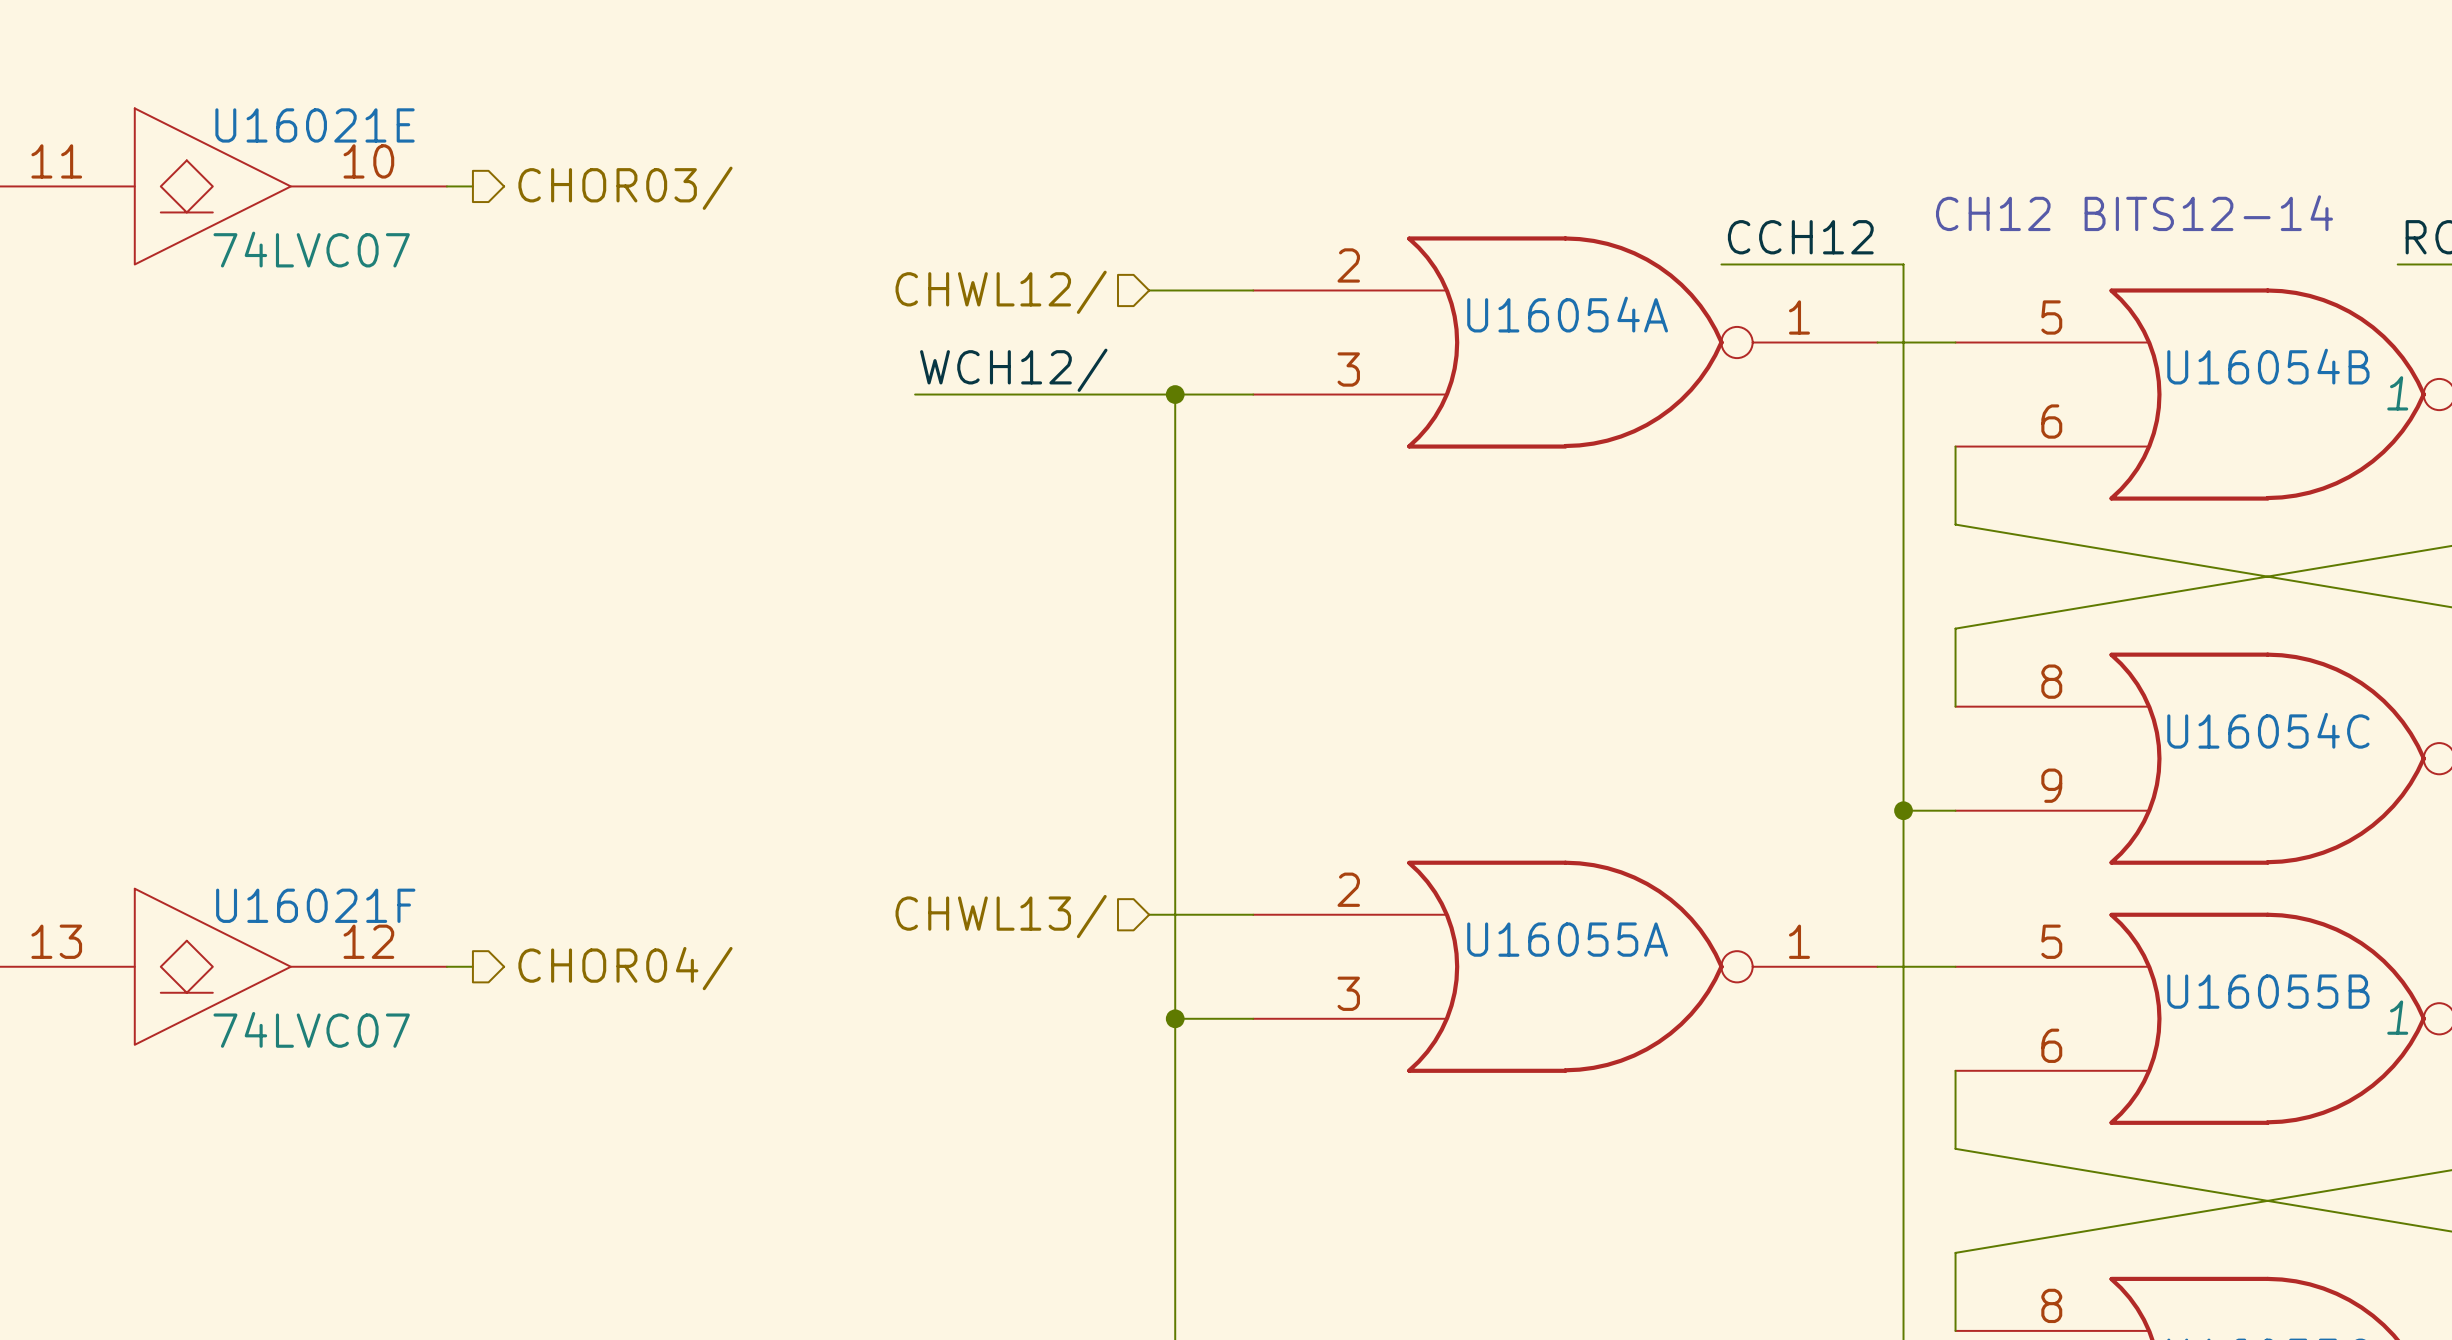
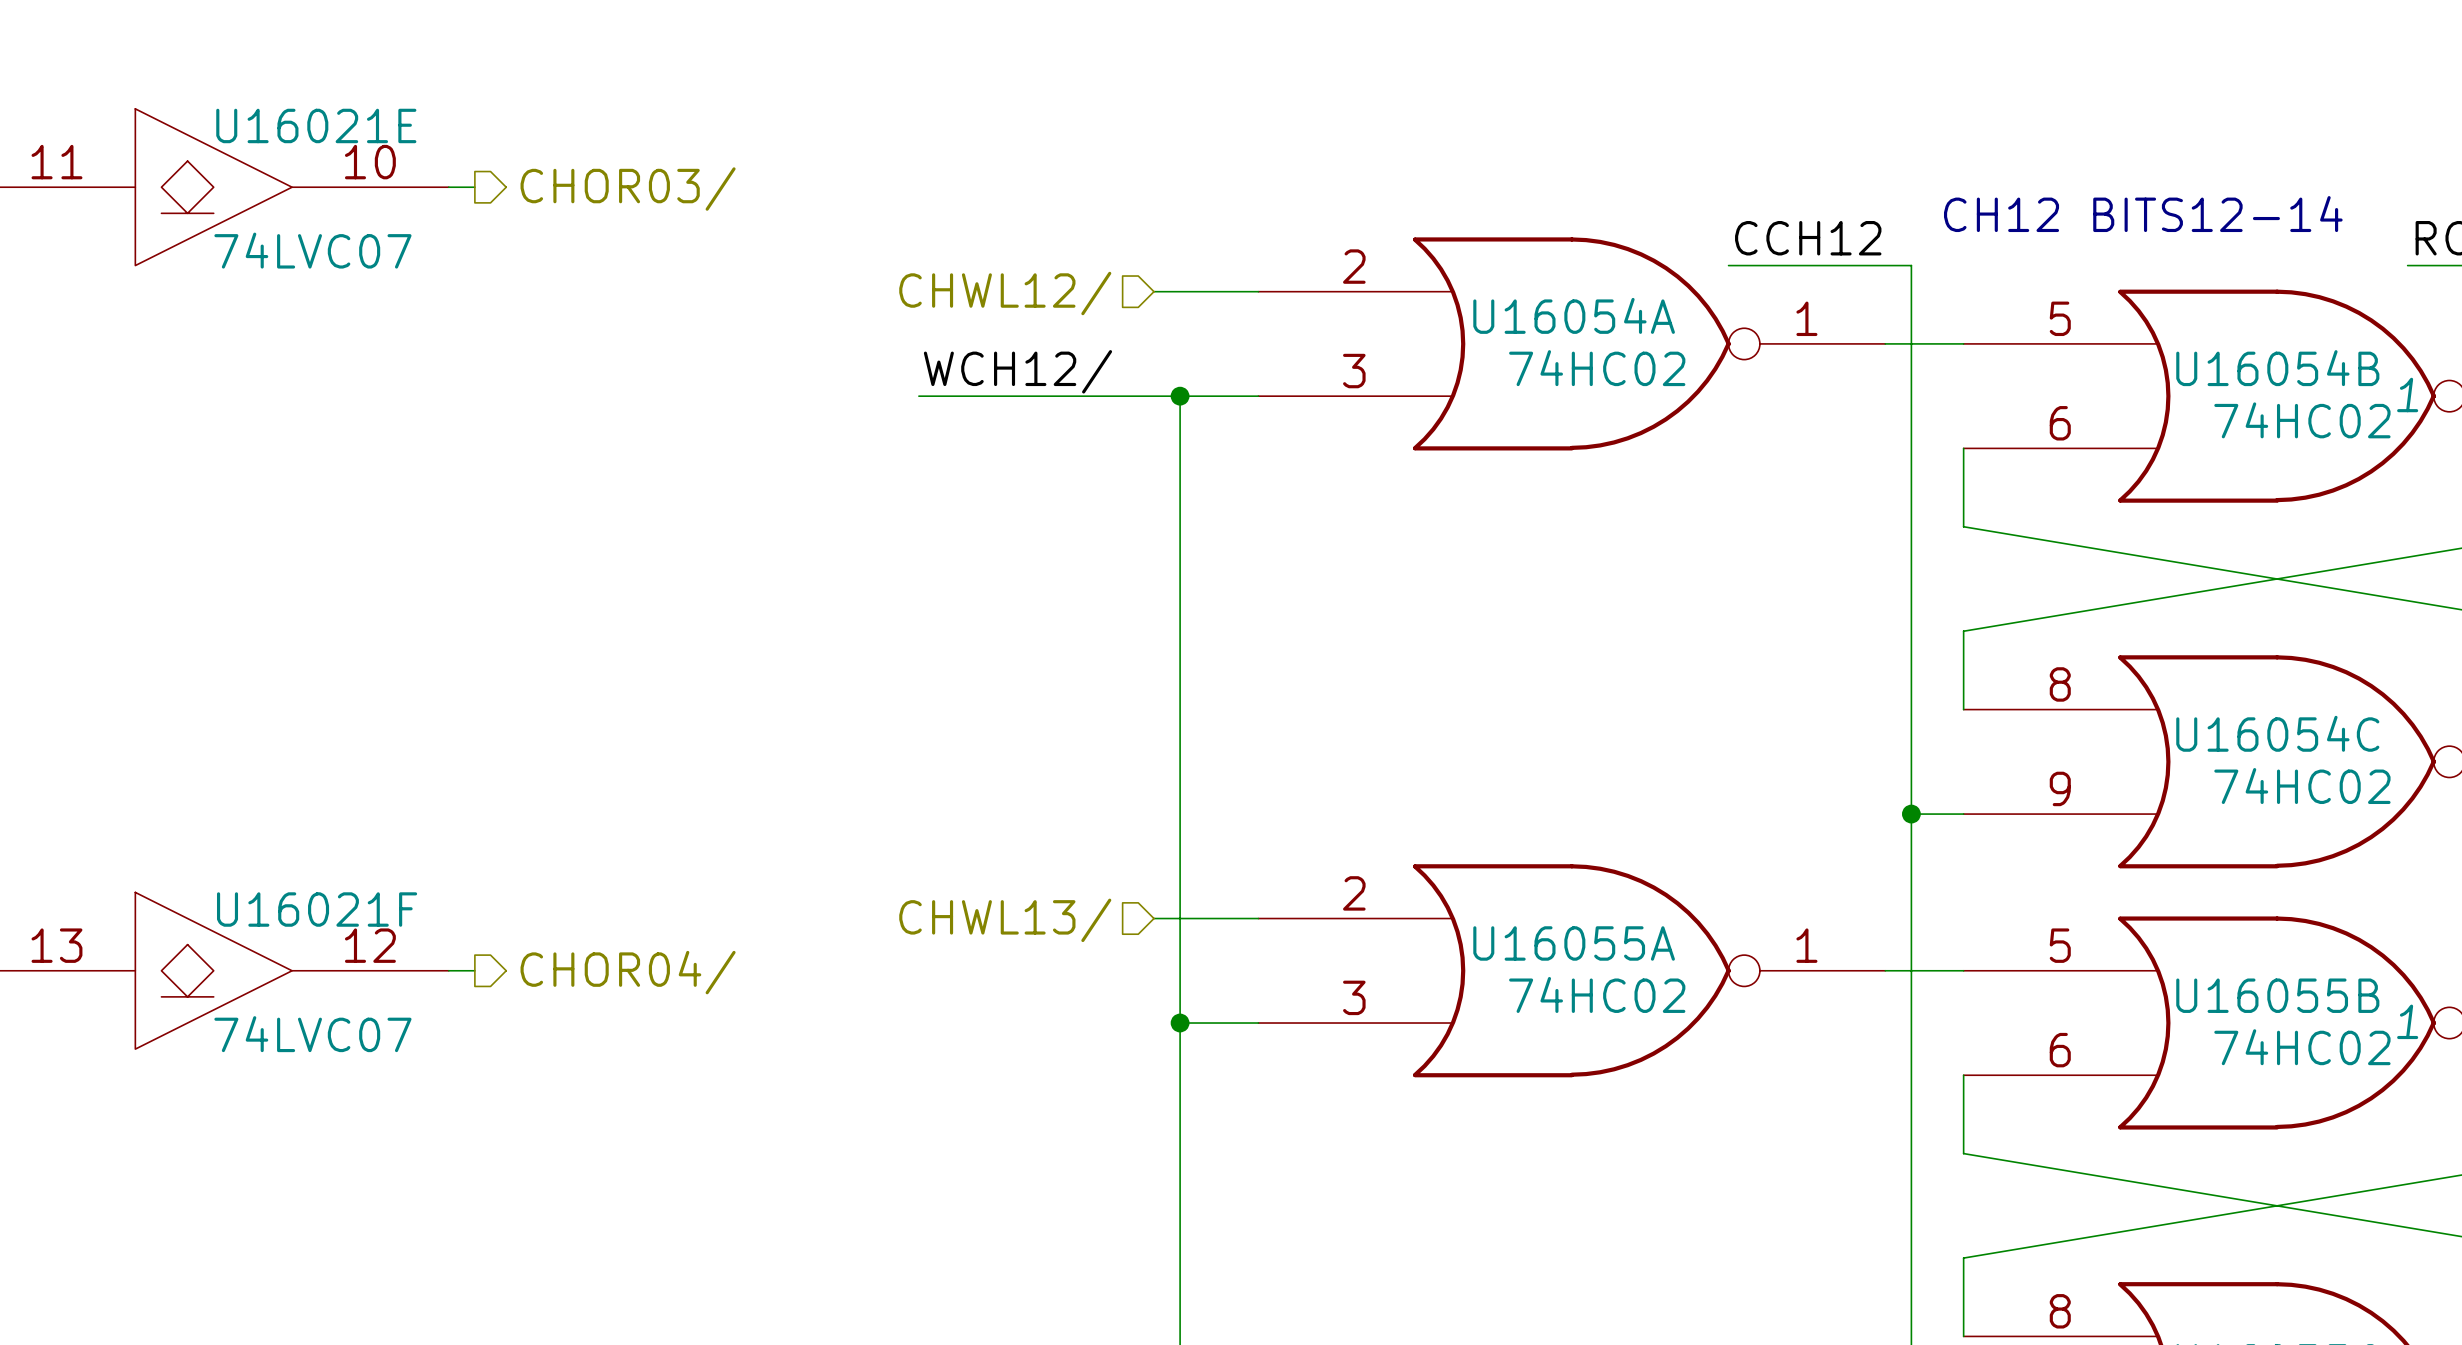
U16054A value: none -> 74HC02 (1597, 368)
U16054B value: none -> 74HC02 (2302, 420)
U16054C value: none -> 74HC02 (2302, 786)
U16055A value: none -> 74HC02 (1597, 994)
U16055B value: none -> 74HC02 (2302, 1047)

